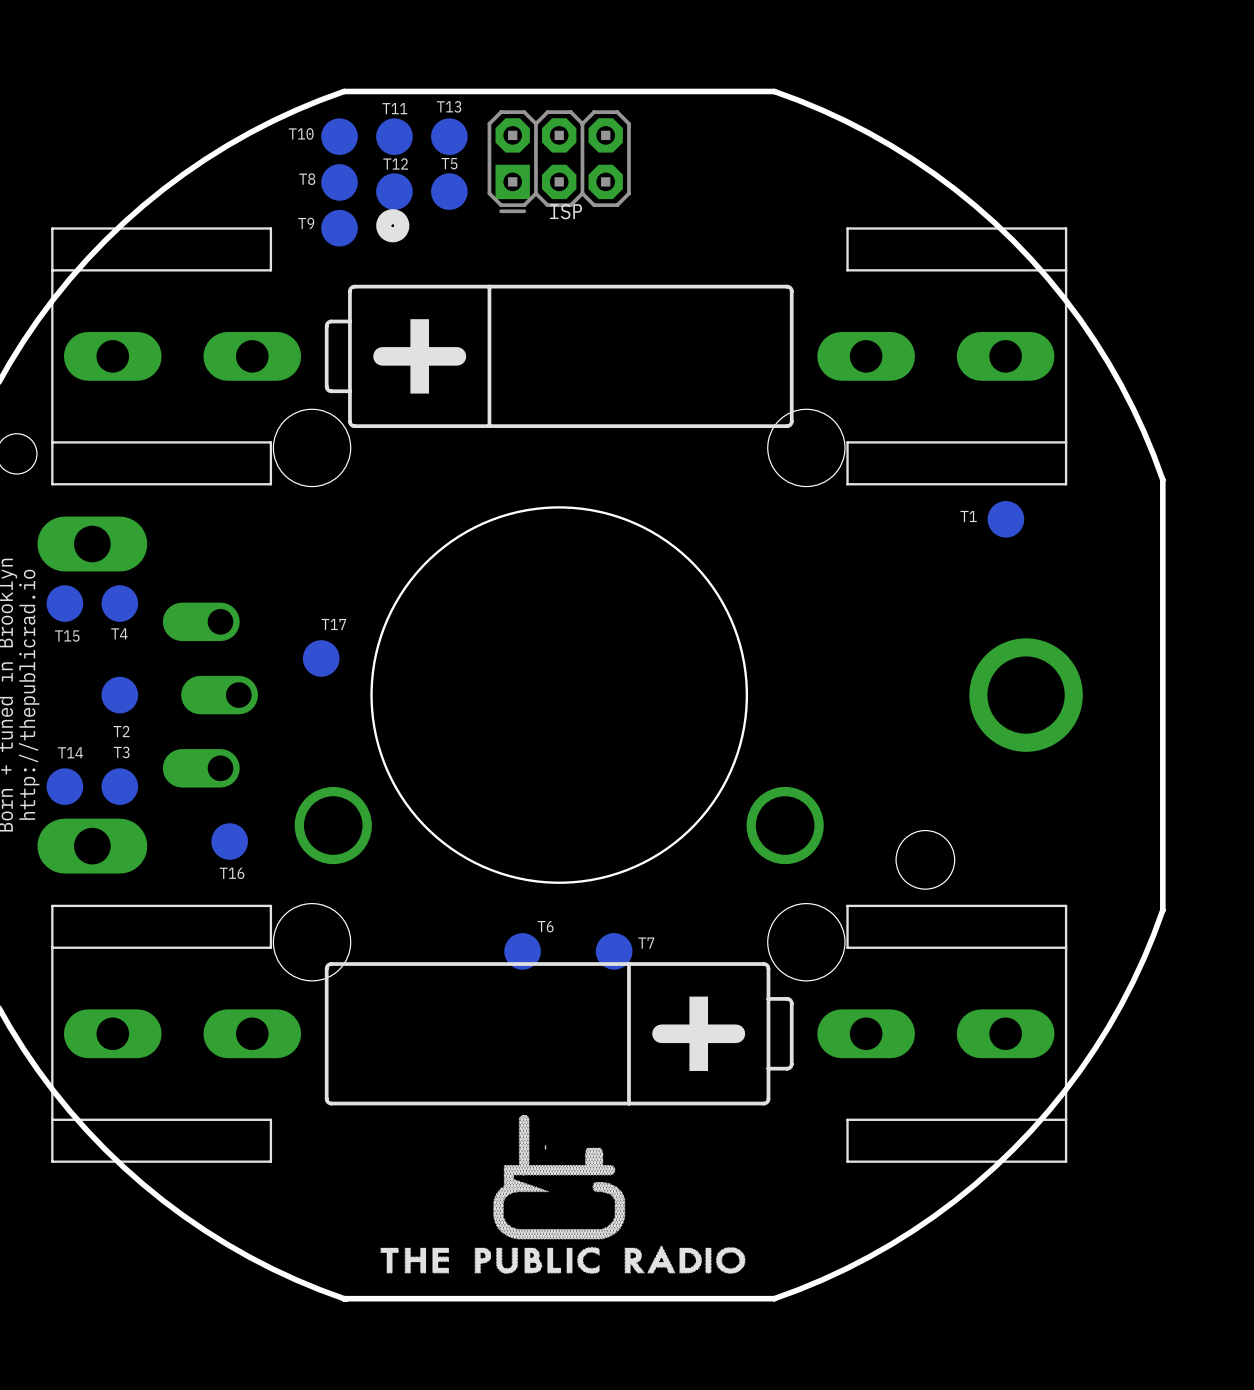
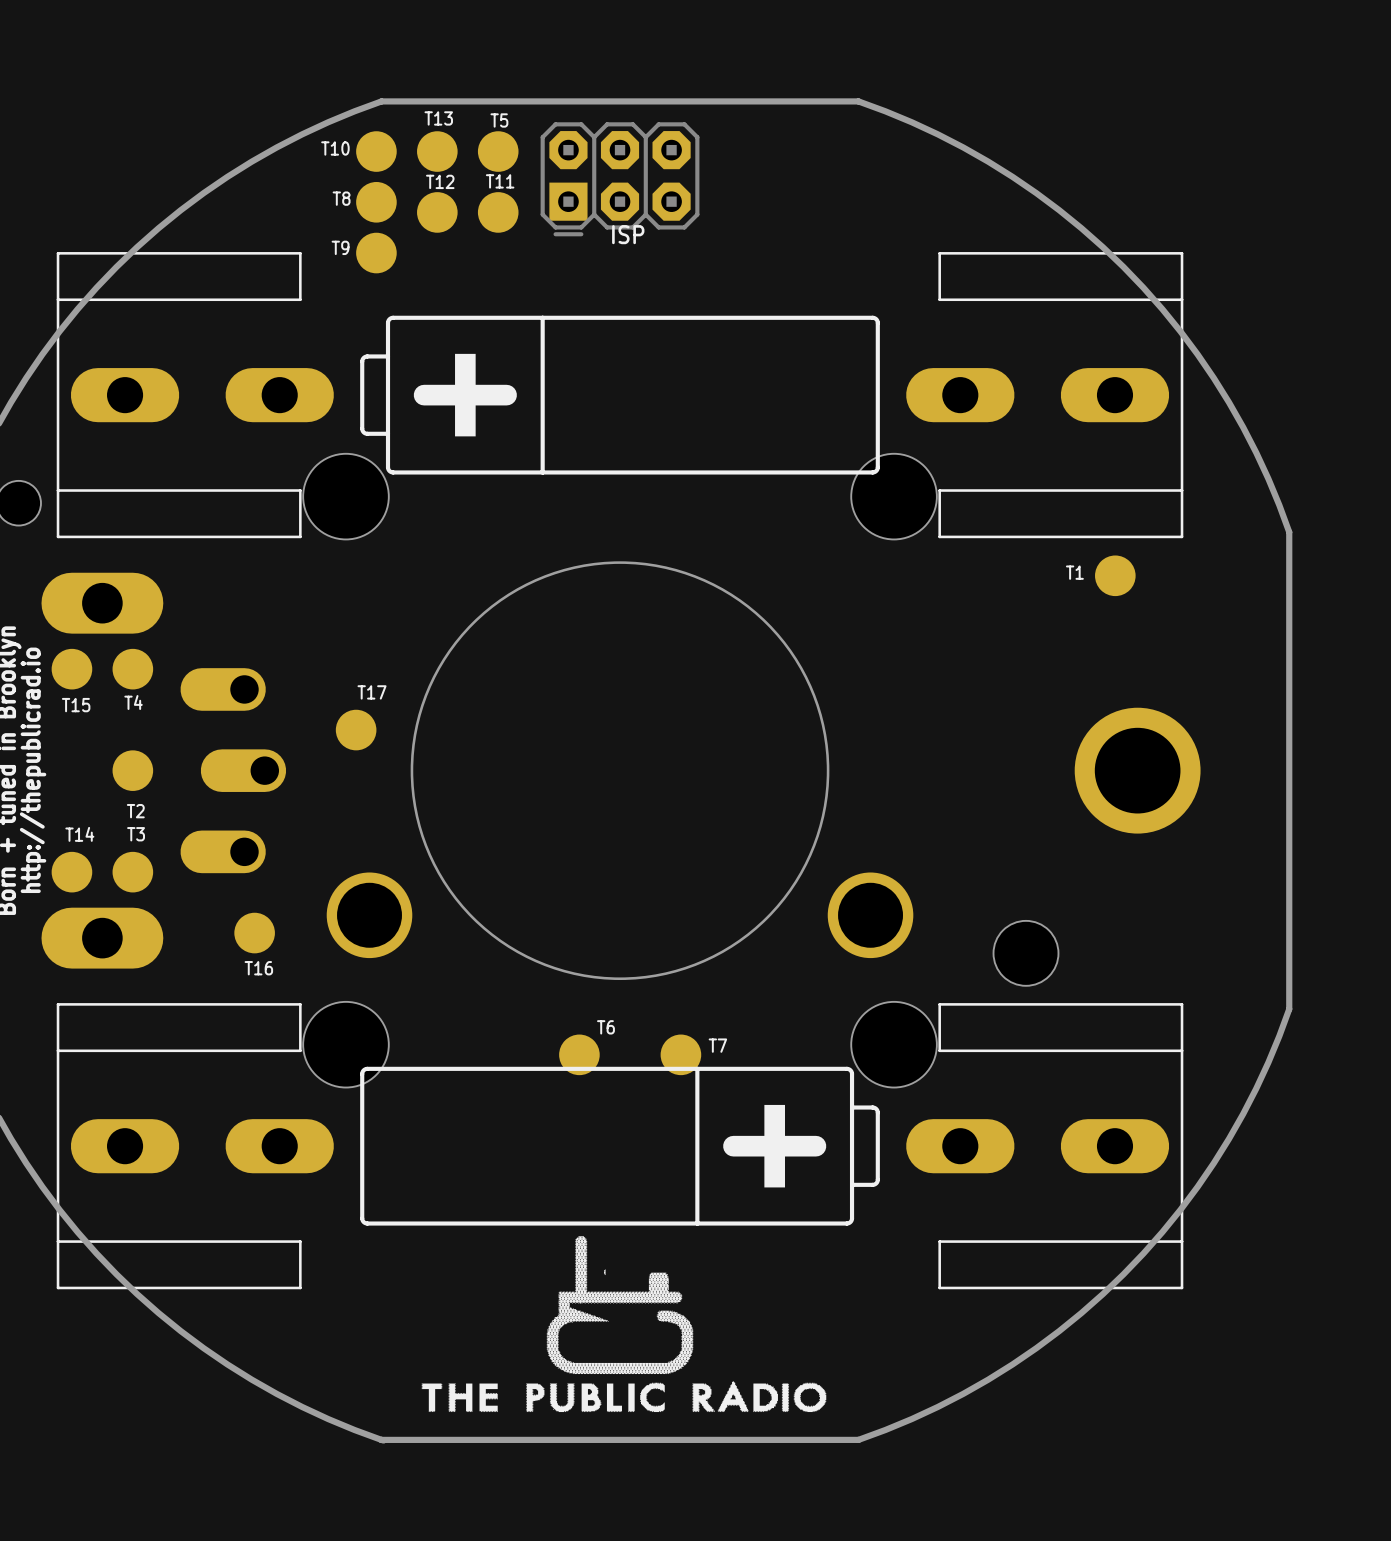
T13 name: T13 (449, 106) -> T5 (499, 120)
T11 name: T11 (394, 108) -> T13 (438, 118)
T5 name: T5 (449, 163) -> T11 (500, 181)
drawing: [376, 209, 410, 243] -> none

